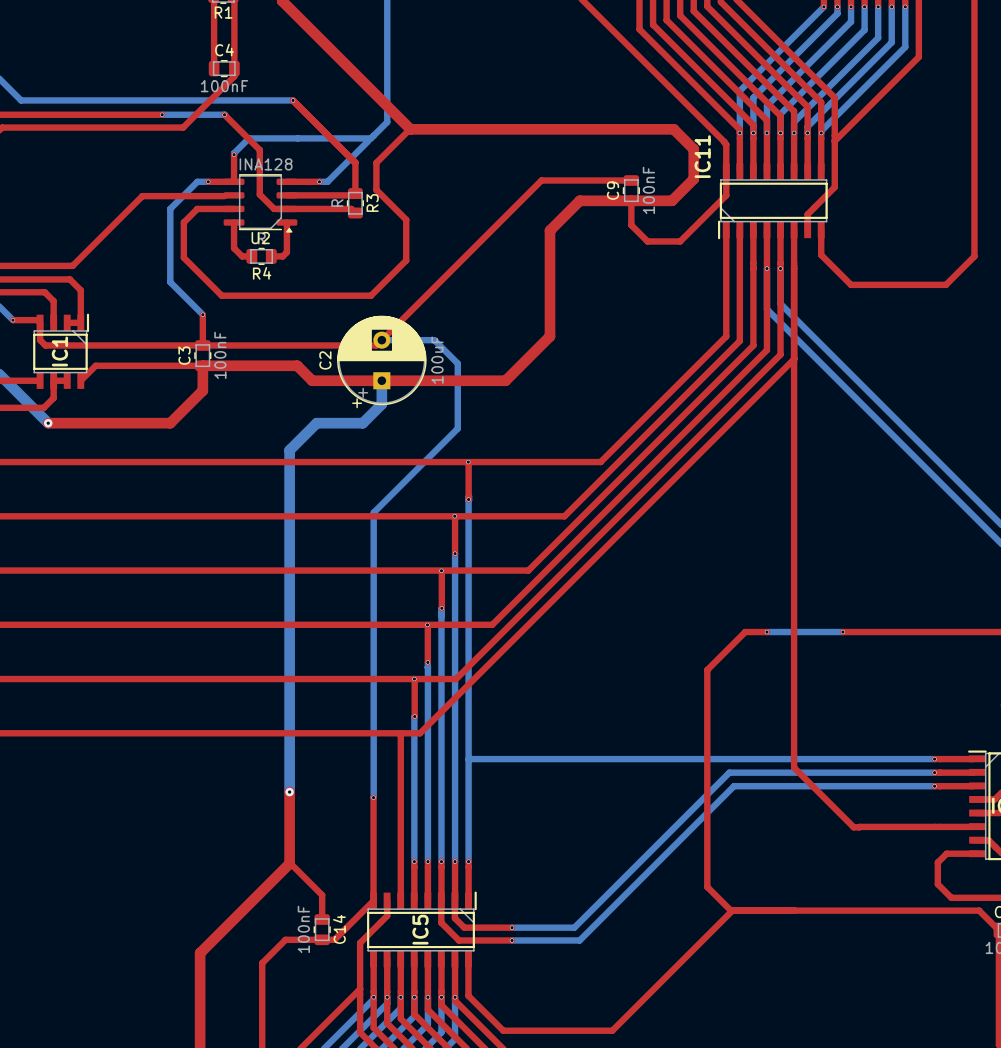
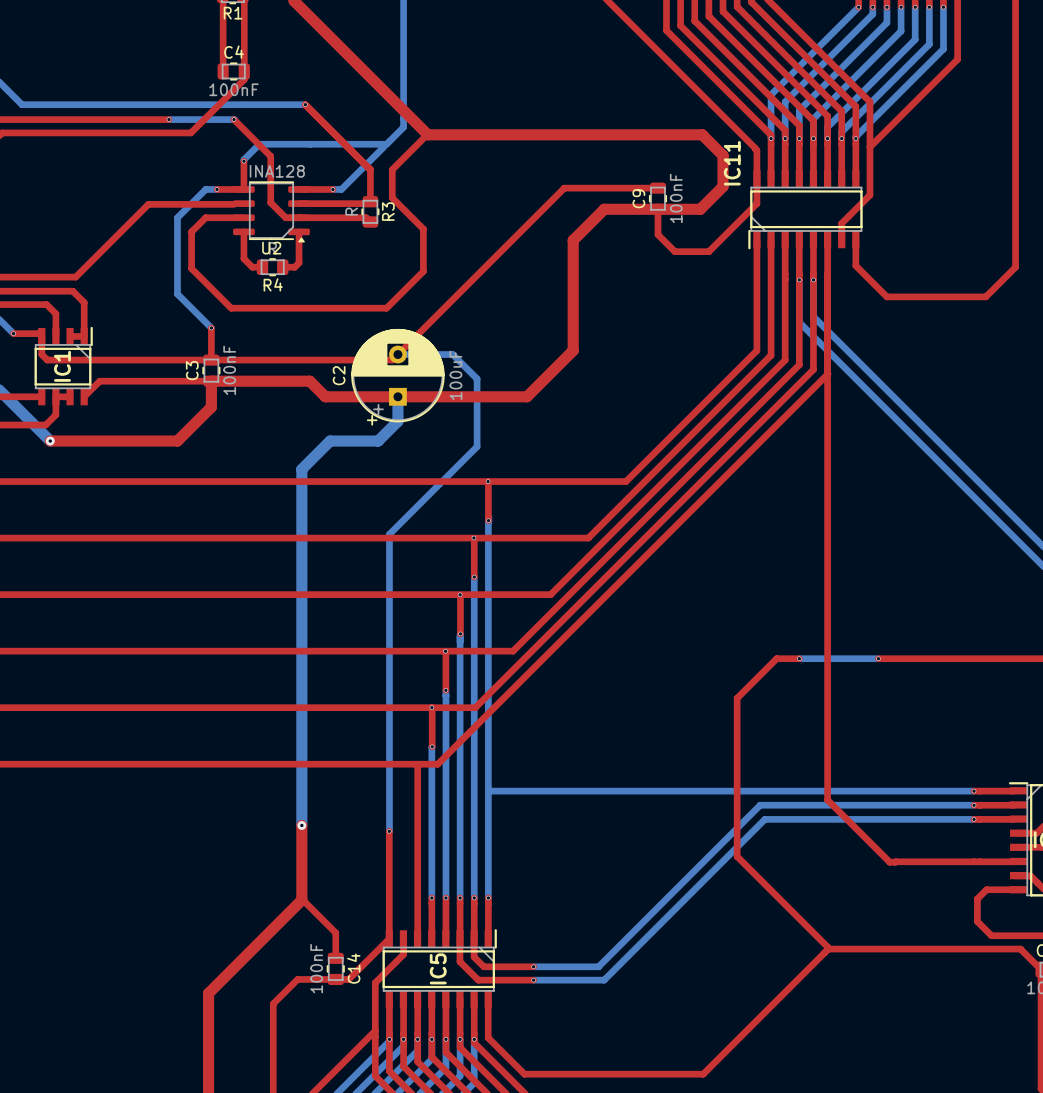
top track: (707, 821) (707, 886) (730, 910) (794, 910) -> none
top track: (732, 910) (612, 1030) -> (737, 856) (828, 949) (703, 1074) (638, 1074)

